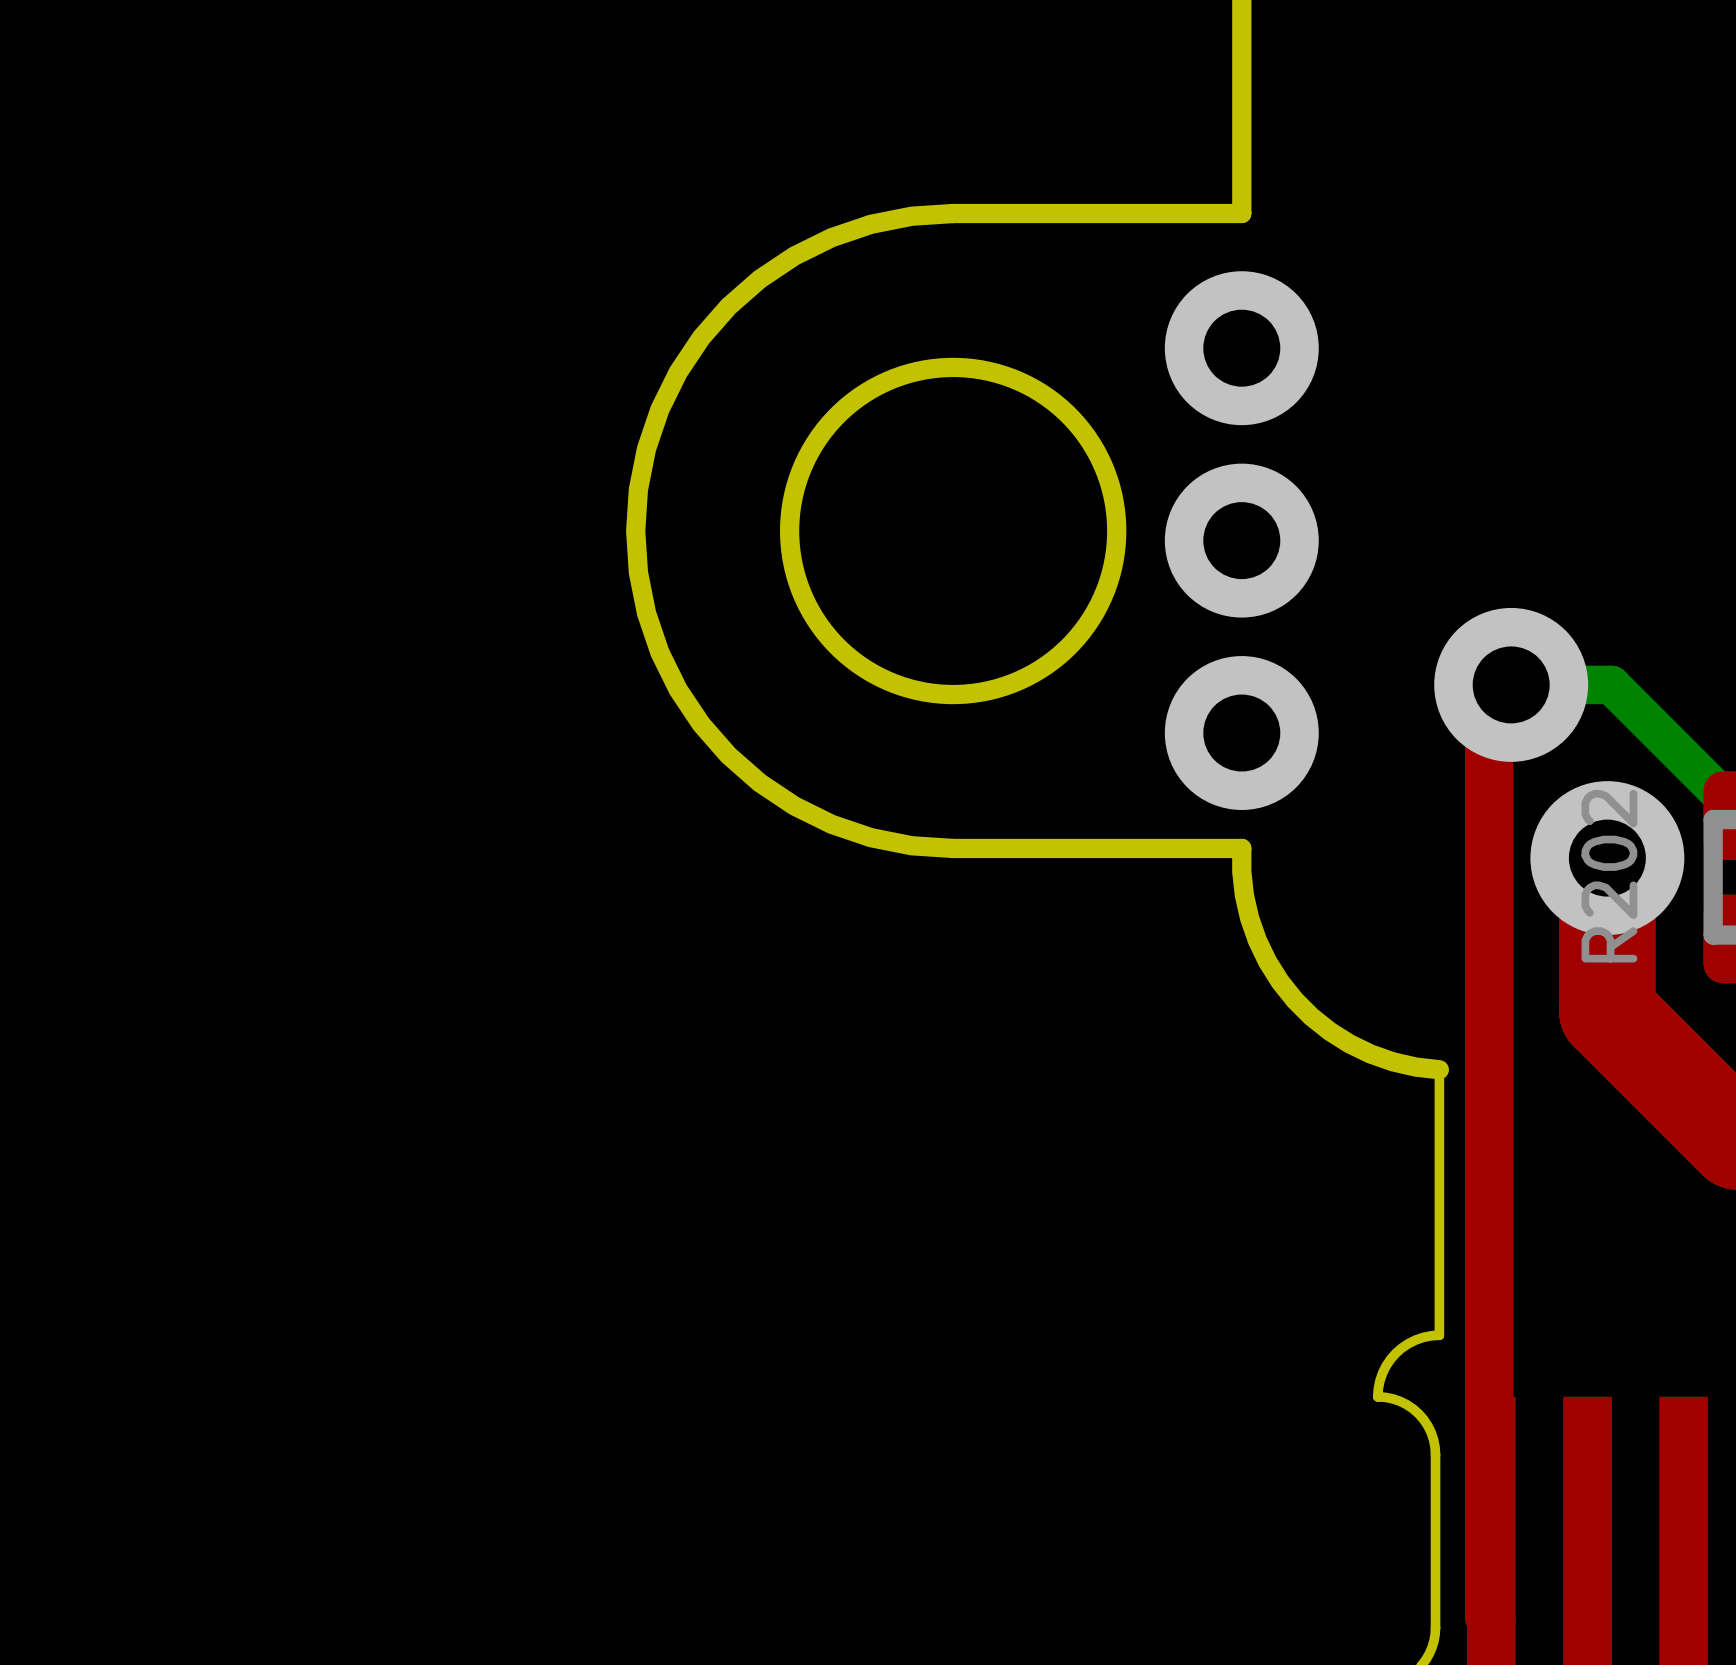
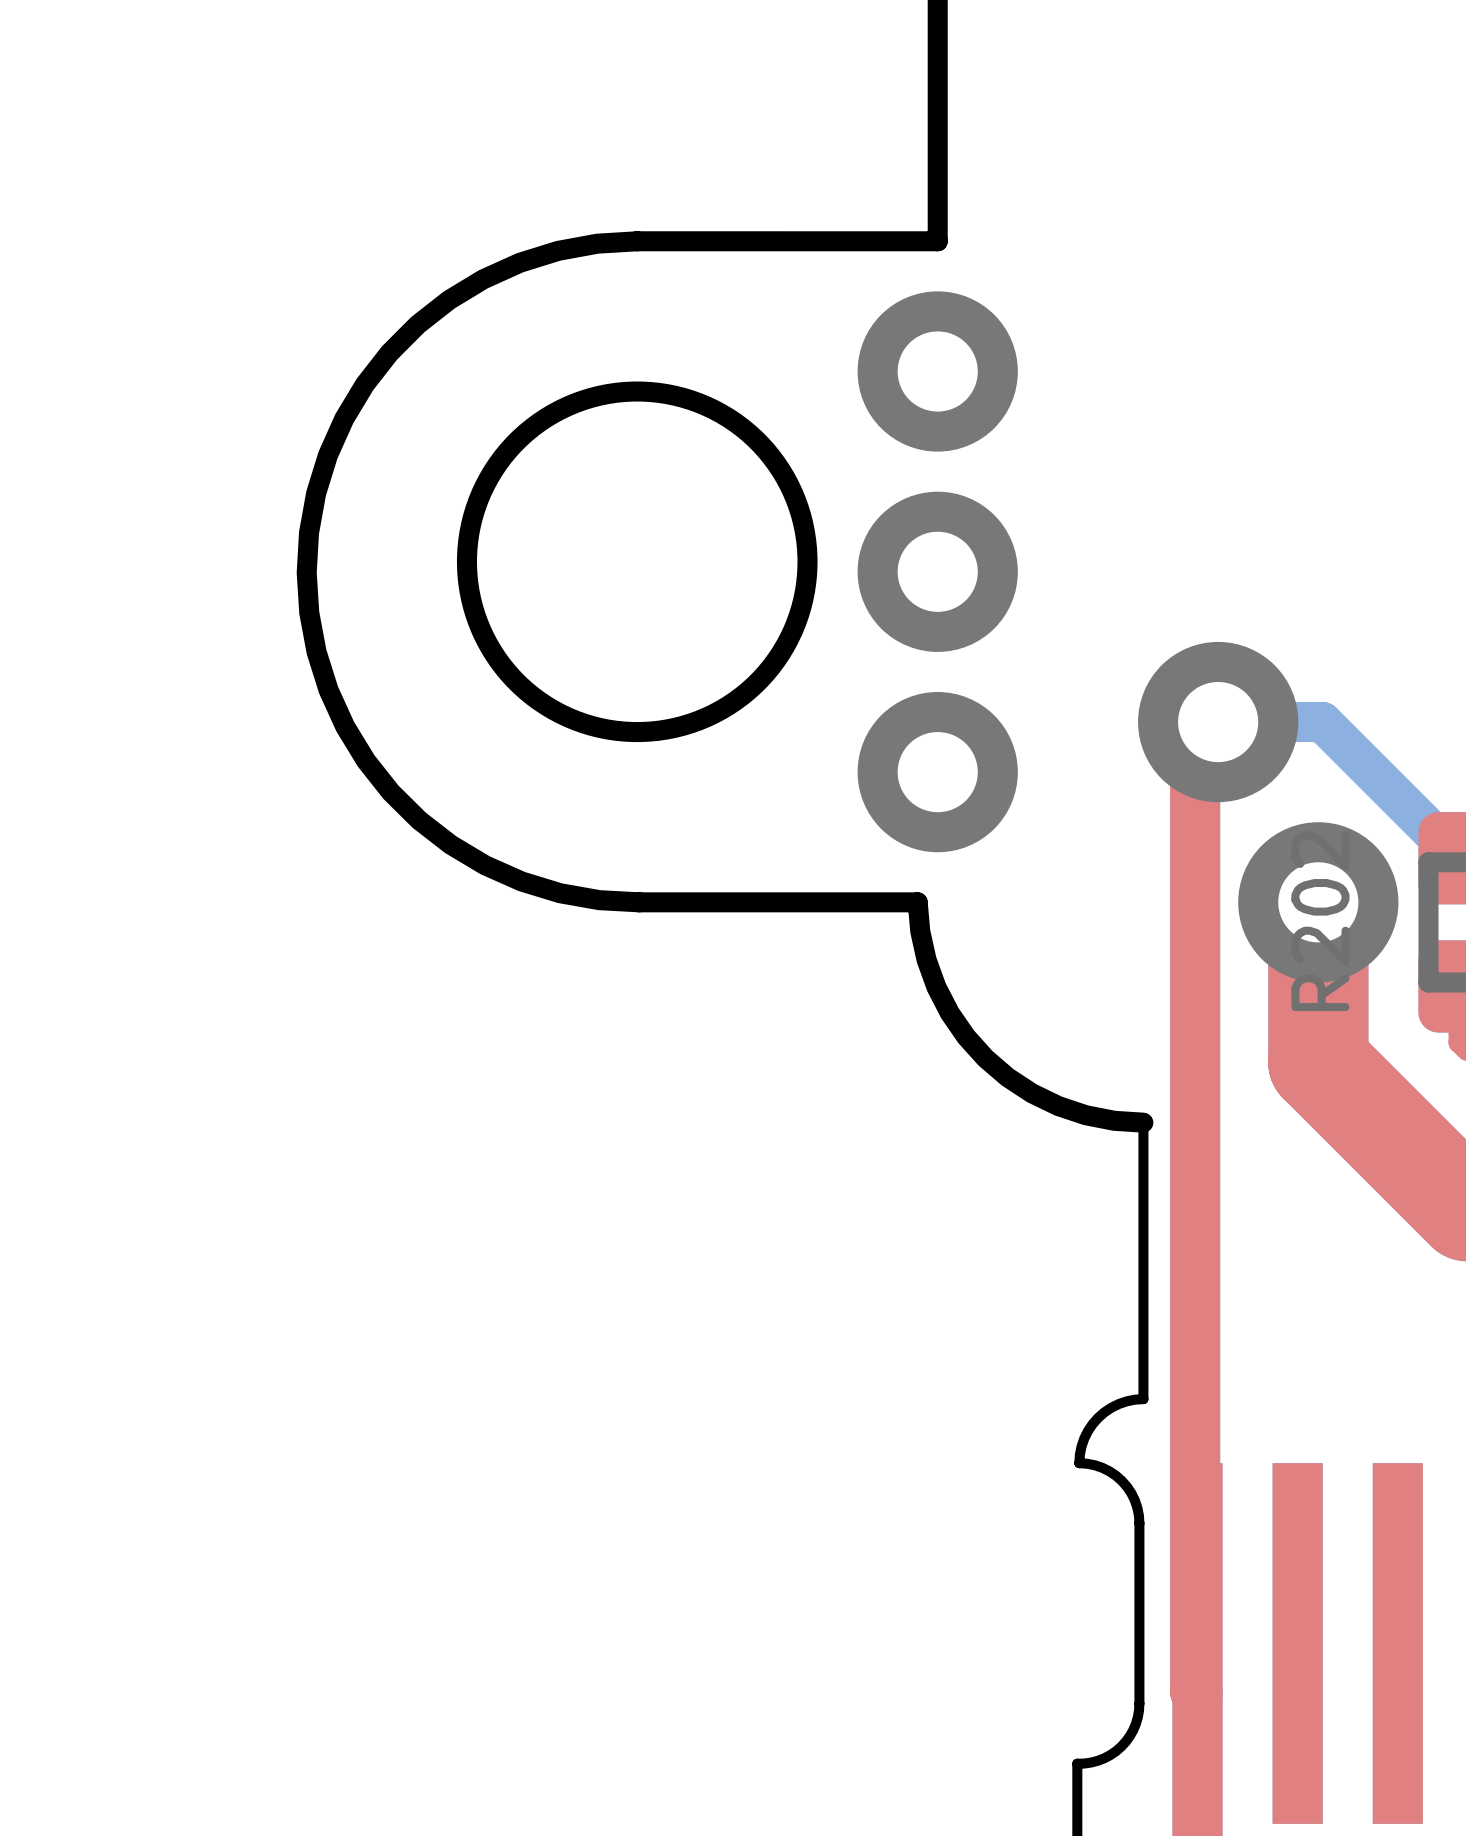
board edge: (1241, 213) (953, 213) (911, 216) (871, 224) (831, 237) (794, 256) (759, 279) (728, 306) (701, 337) (678, 372) (659, 409) (646, 448) (638, 489) (635, 530) (638, 572) (646, 613) (659, 652) (678, 689) (701, 724) (728, 755) (759, 782) (794, 805) (831, 824) (871, 837) (911, 845) (953, 848) (1241, 848) (1244, 895) (1257, 940) (1280, 981) (1294, 1000) (1329, 1031) (1370, 1054) (1416, 1067) (1439, 1069) -> (937, 231) (937, 241) (637, 241) (597, 243) (557, 250) (519, 262) (483, 279) (449, 300) (417, 324) (389, 353) (364, 384) (344, 418) (327, 455) (316, 493) (309, 532) (306, 572) (309, 612) (316, 652) (328, 690) (345, 726) (366, 760) (390, 792) (419, 820) (450, 844) (485, 865) (521, 881) (559, 893) (599, 900) (639, 902) (917, 902) (920, 931) (926, 959) (936, 987) (949, 1012) (966, 1036) (985, 1058) (1007, 1077) (1032, 1093) (1058, 1106) (1085, 1115) (1114, 1120) (1143, 1122)

